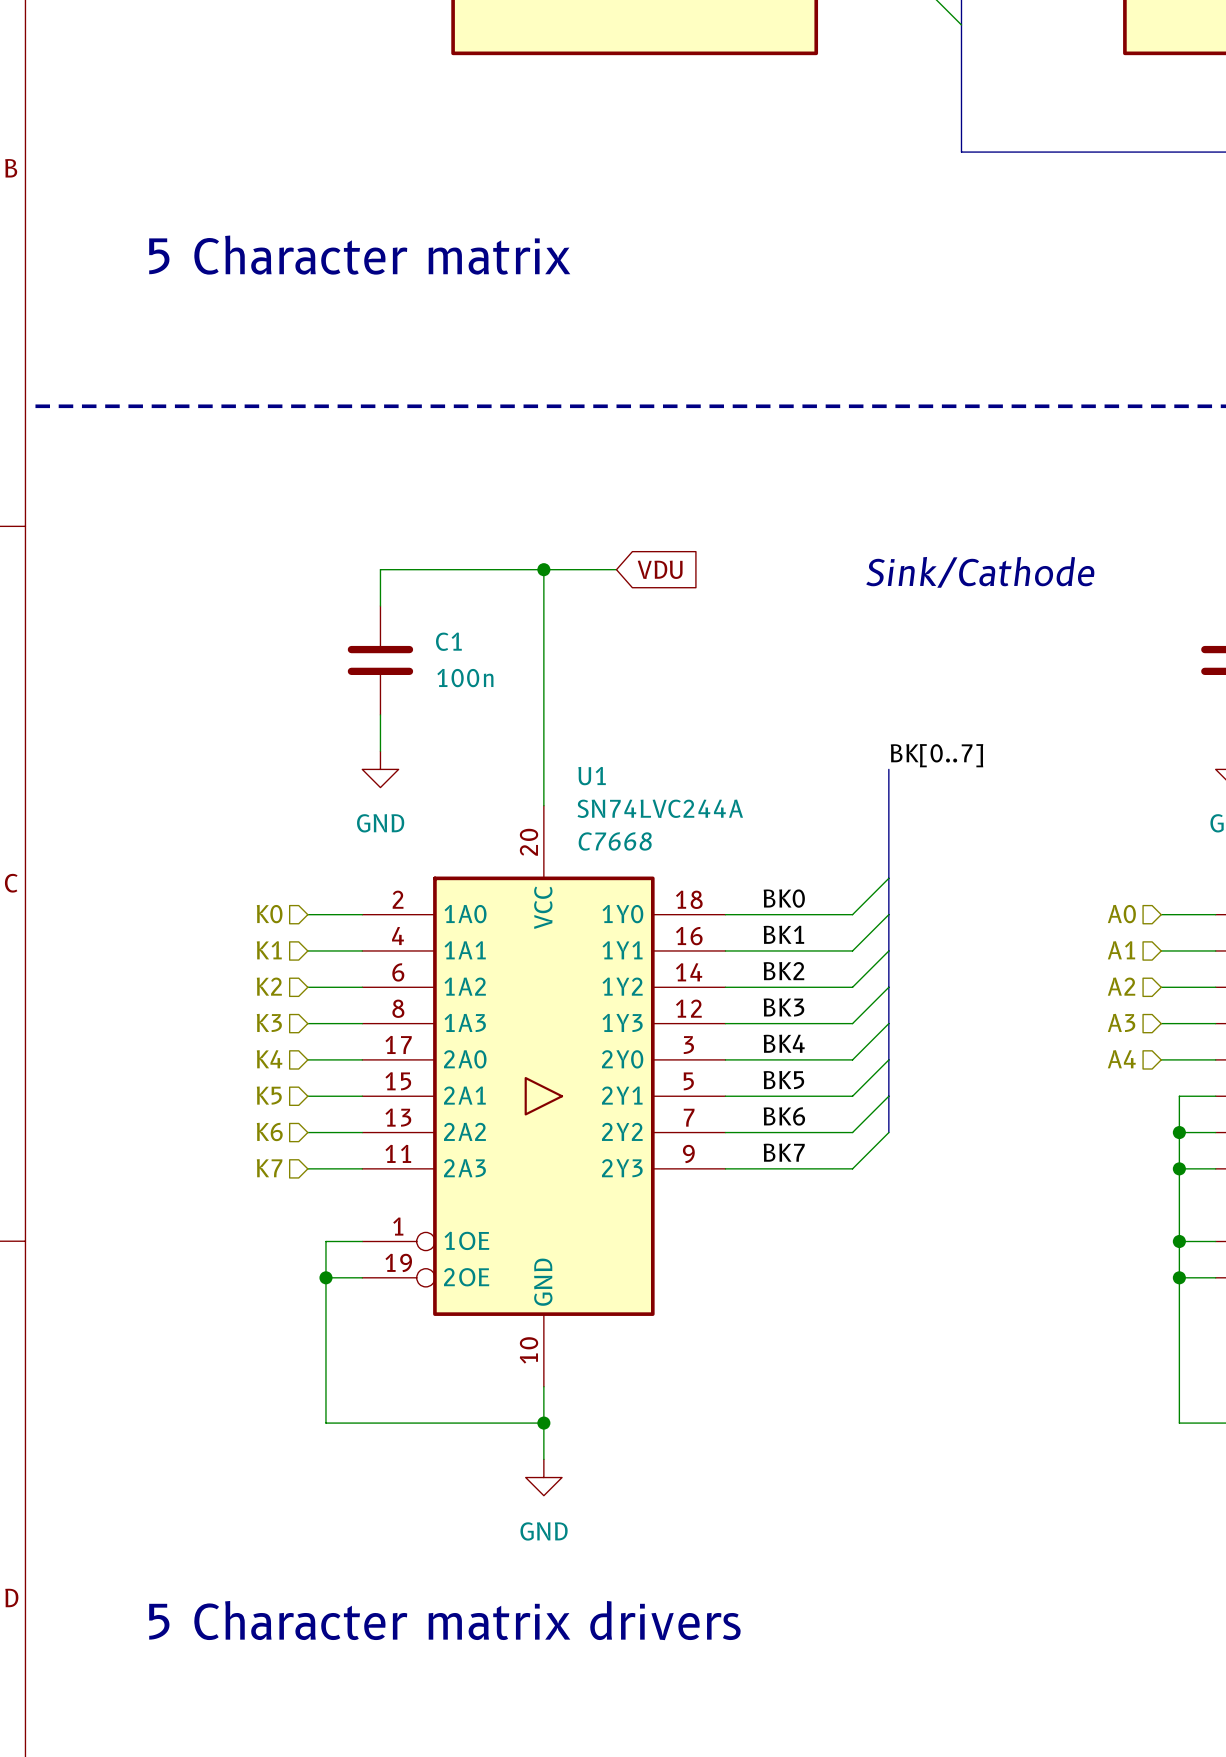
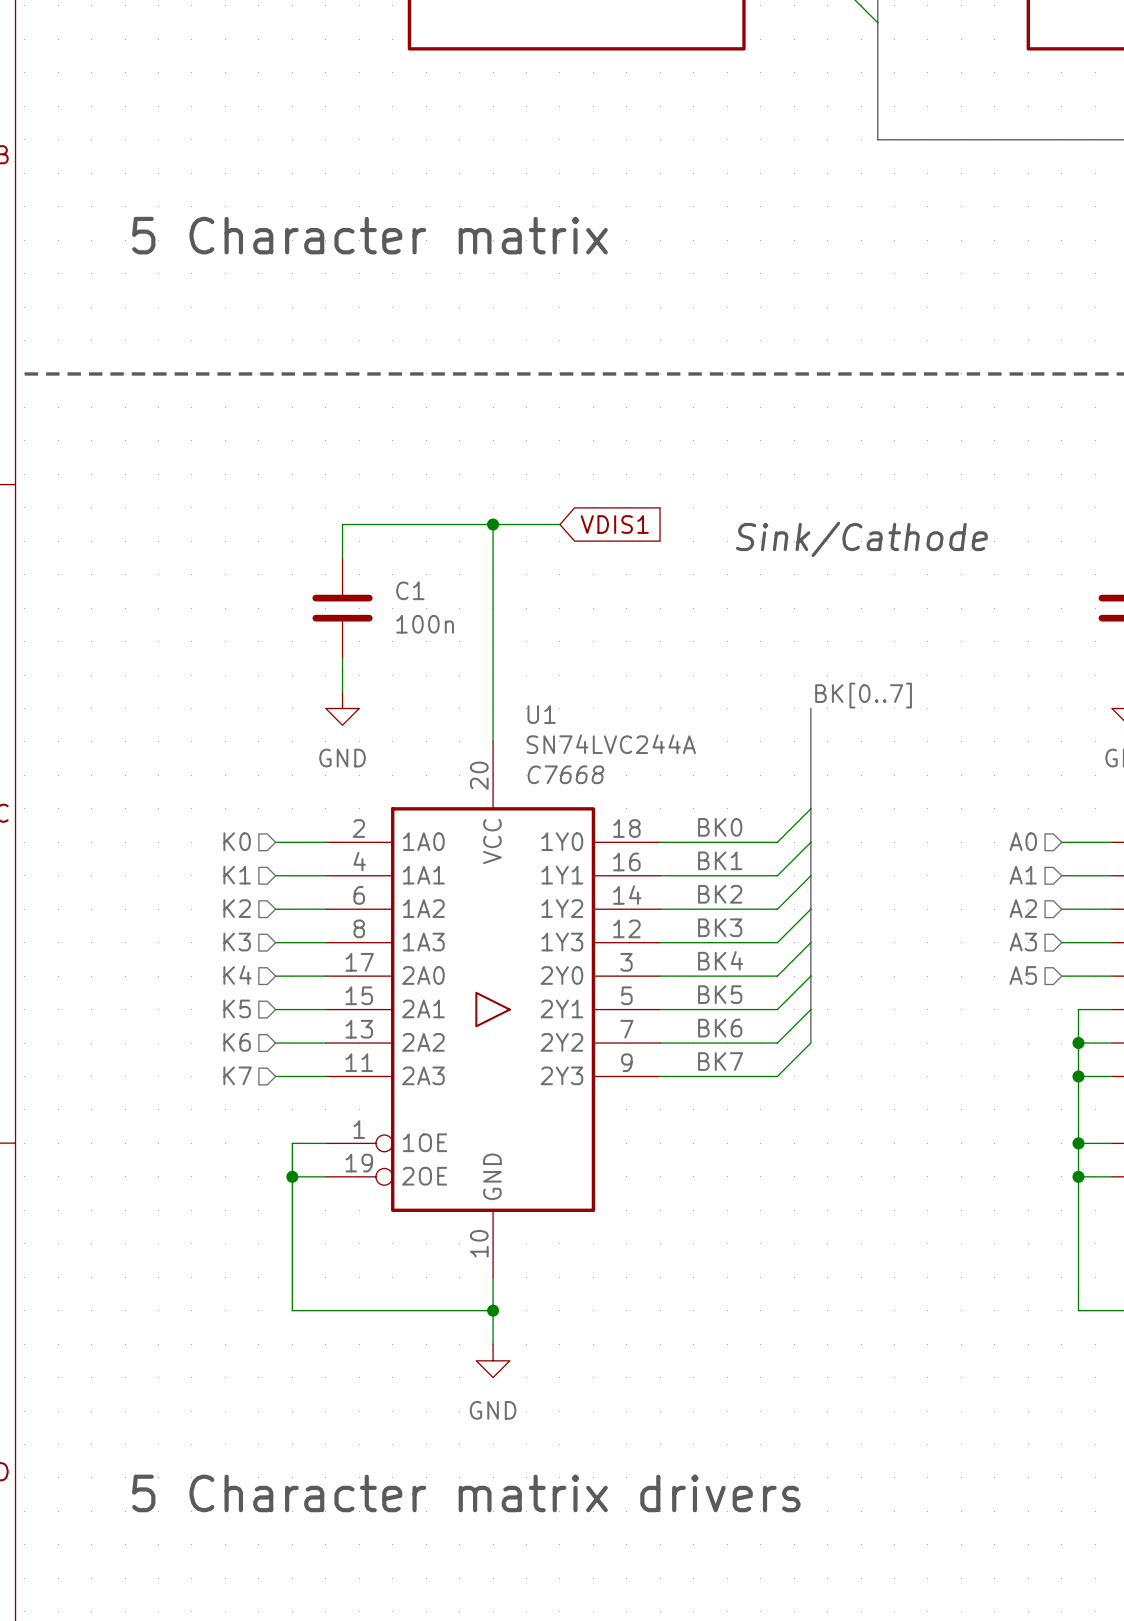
global label: VDU (660, 569) -> VDIS1 (614, 524)
text position: Sink/Cathode (980, 572) -> Sink/Cathode (861, 539)
hierarchical label: A4 (1121, 1059) -> A5 (1023, 975)

